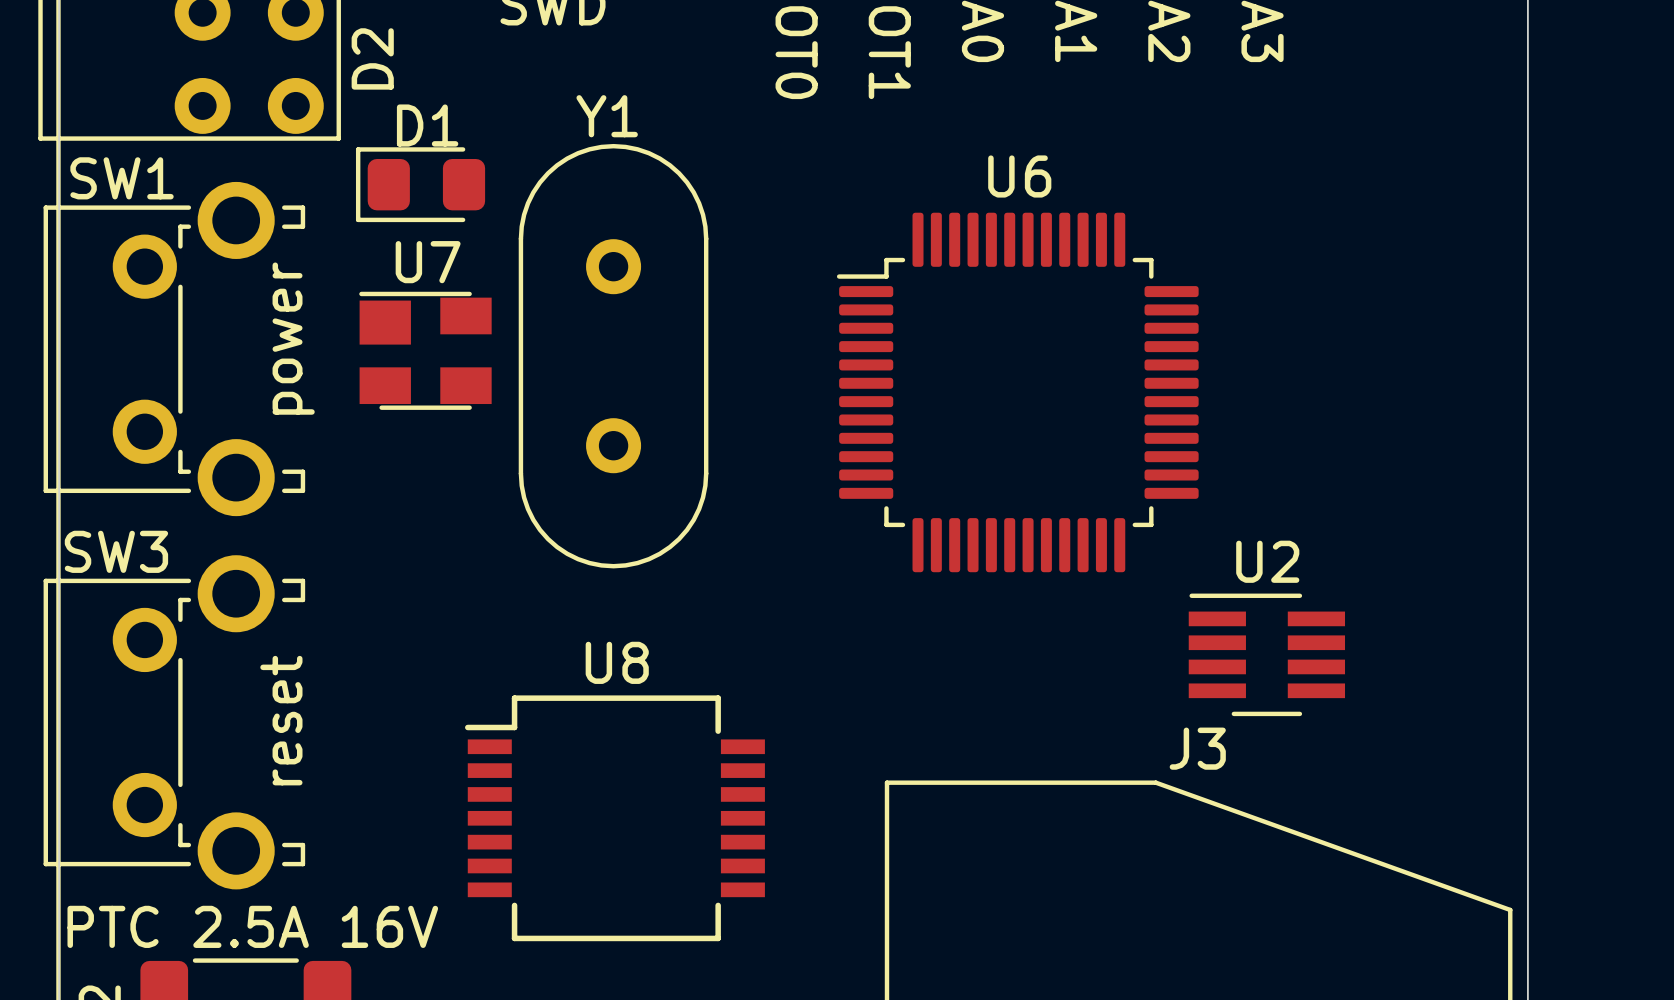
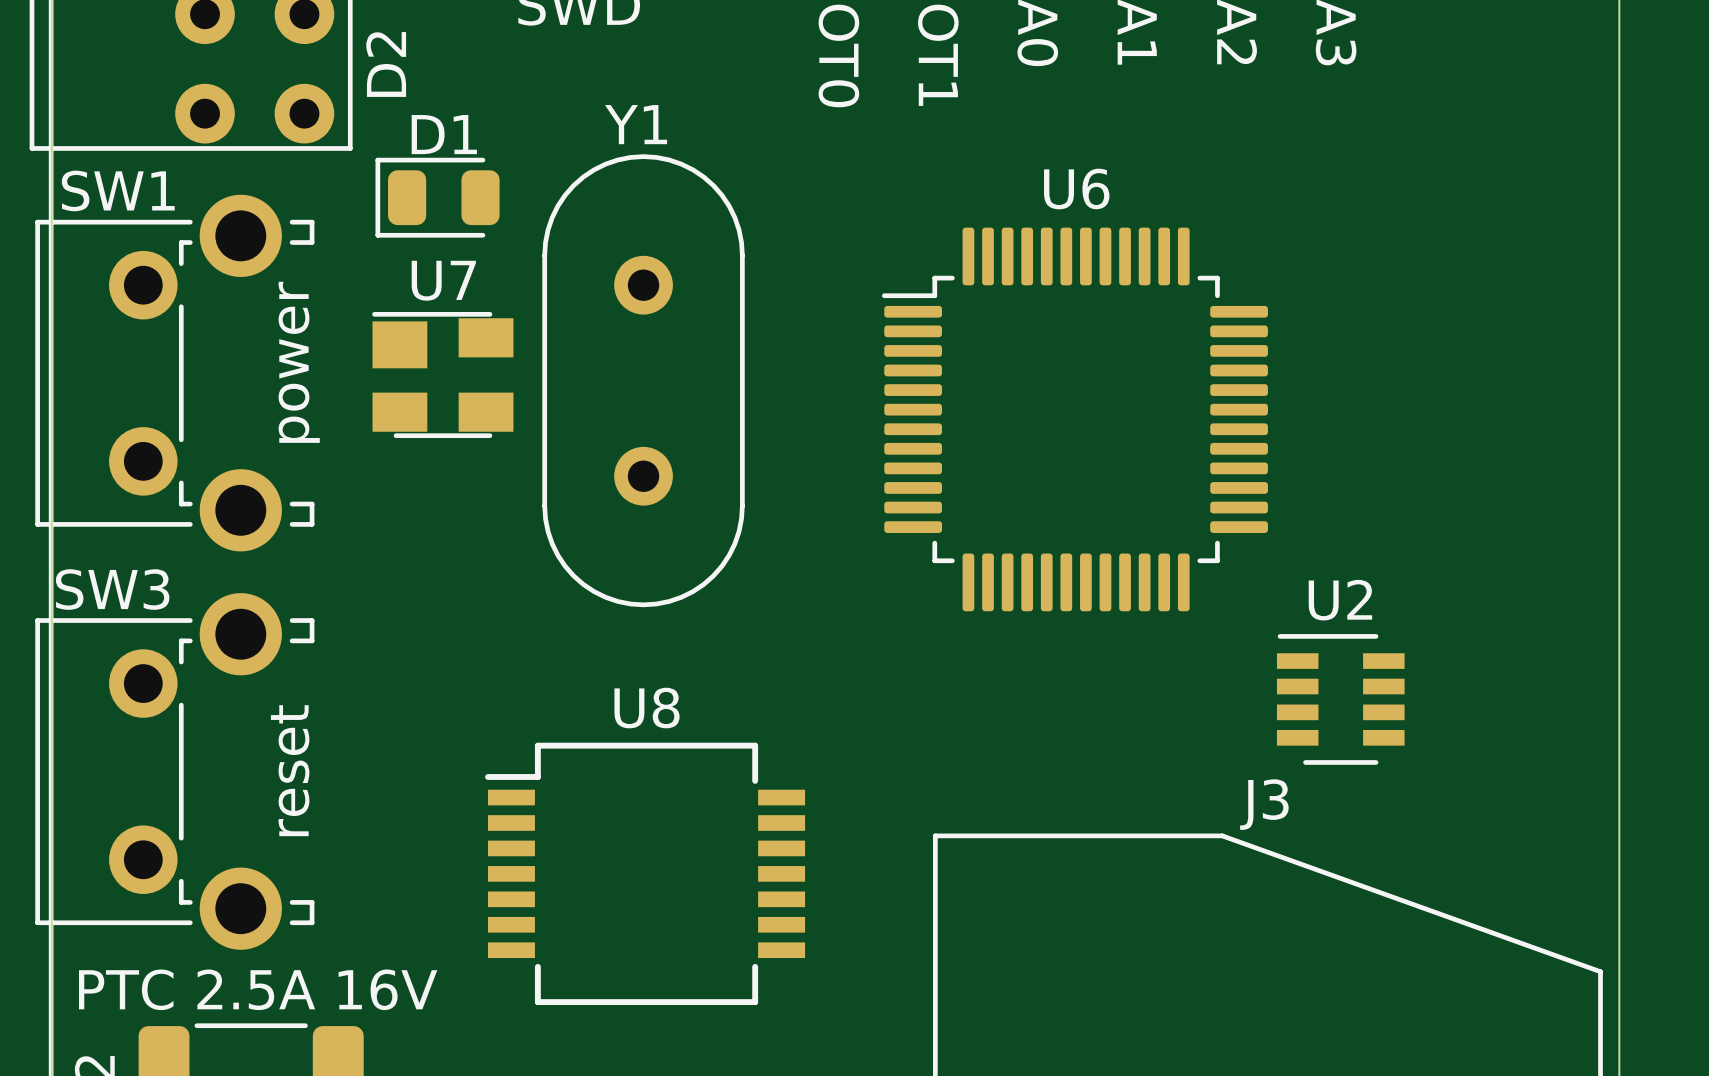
D1 footprint: [355, 147, 486, 223] -> [375, 157, 500, 238]
U2 footprint: [1188, 593, 1346, 717] -> [1276, 634, 1405, 765]

